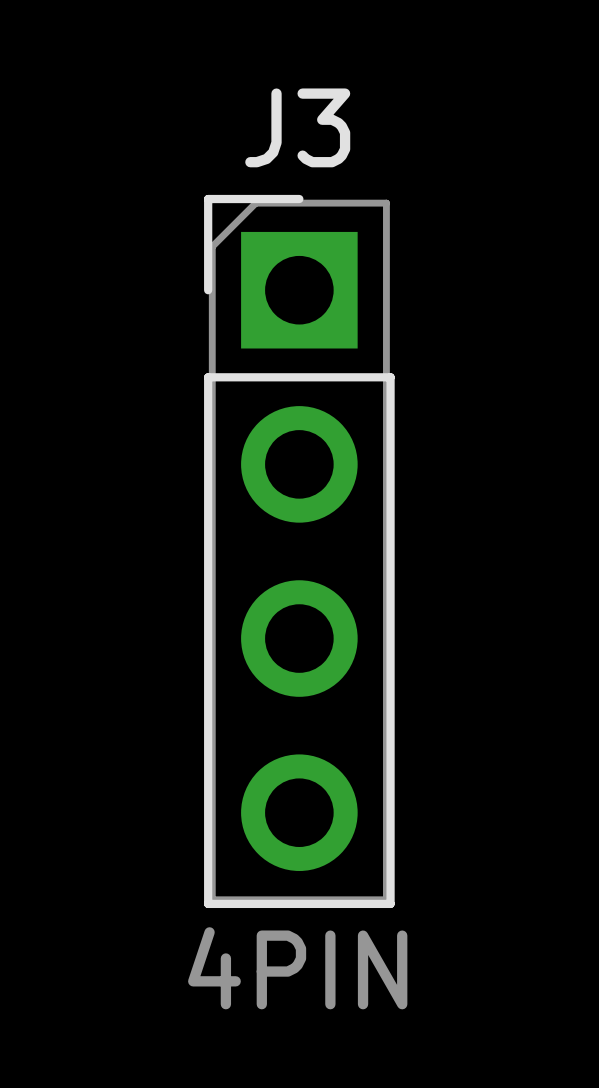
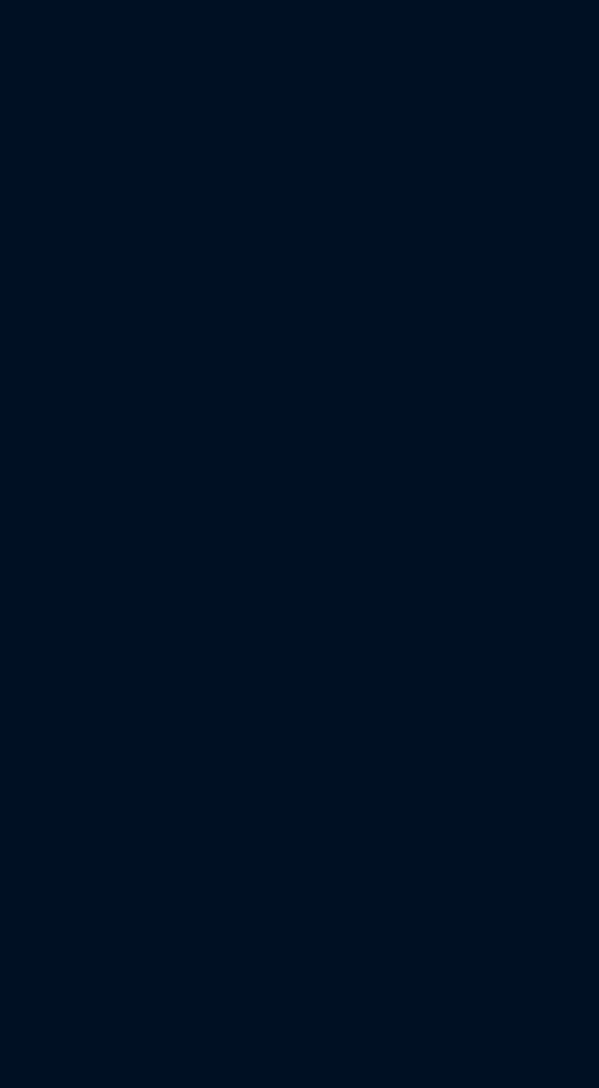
J3: 4PIN (299, 551) -> none

